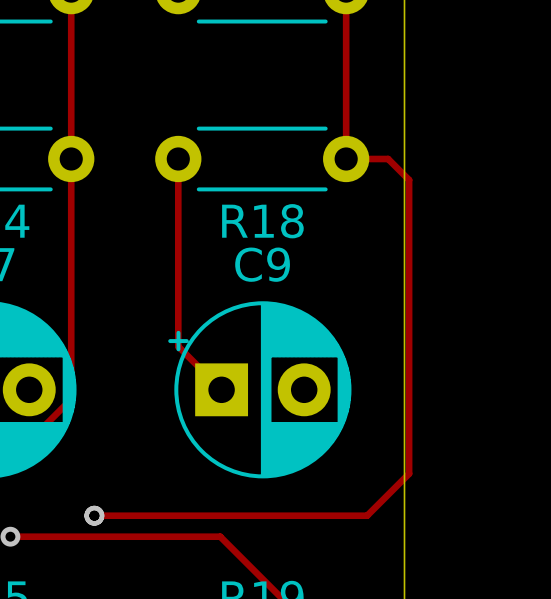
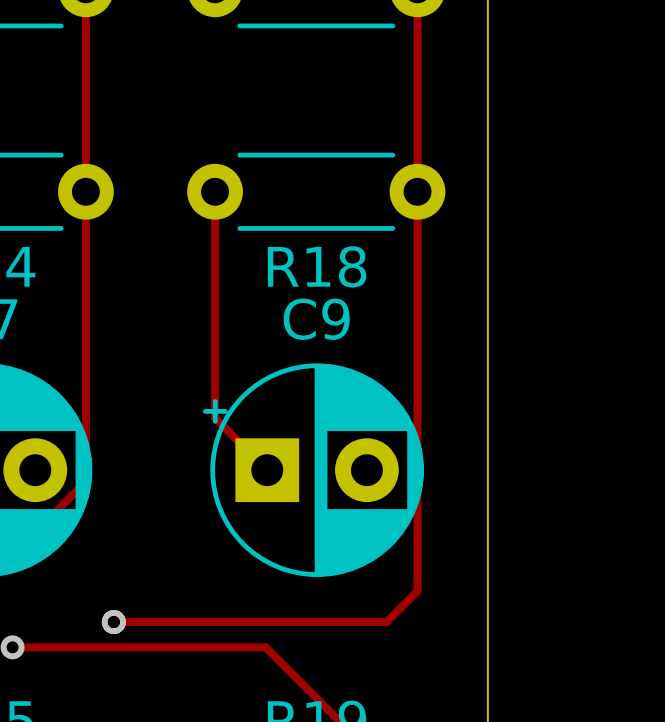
track: (346, 158) (388, 158) (409, 179) (409, 473) (367, 515) (320, 515) -> (417, 191) (417, 591) (386, 622)

